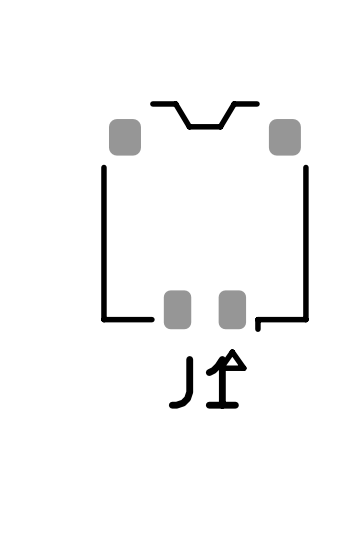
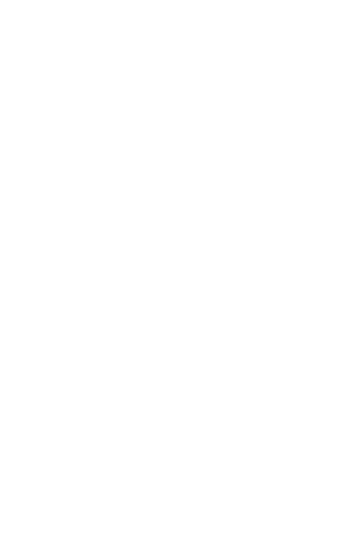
J1: (204, 236) -> none

